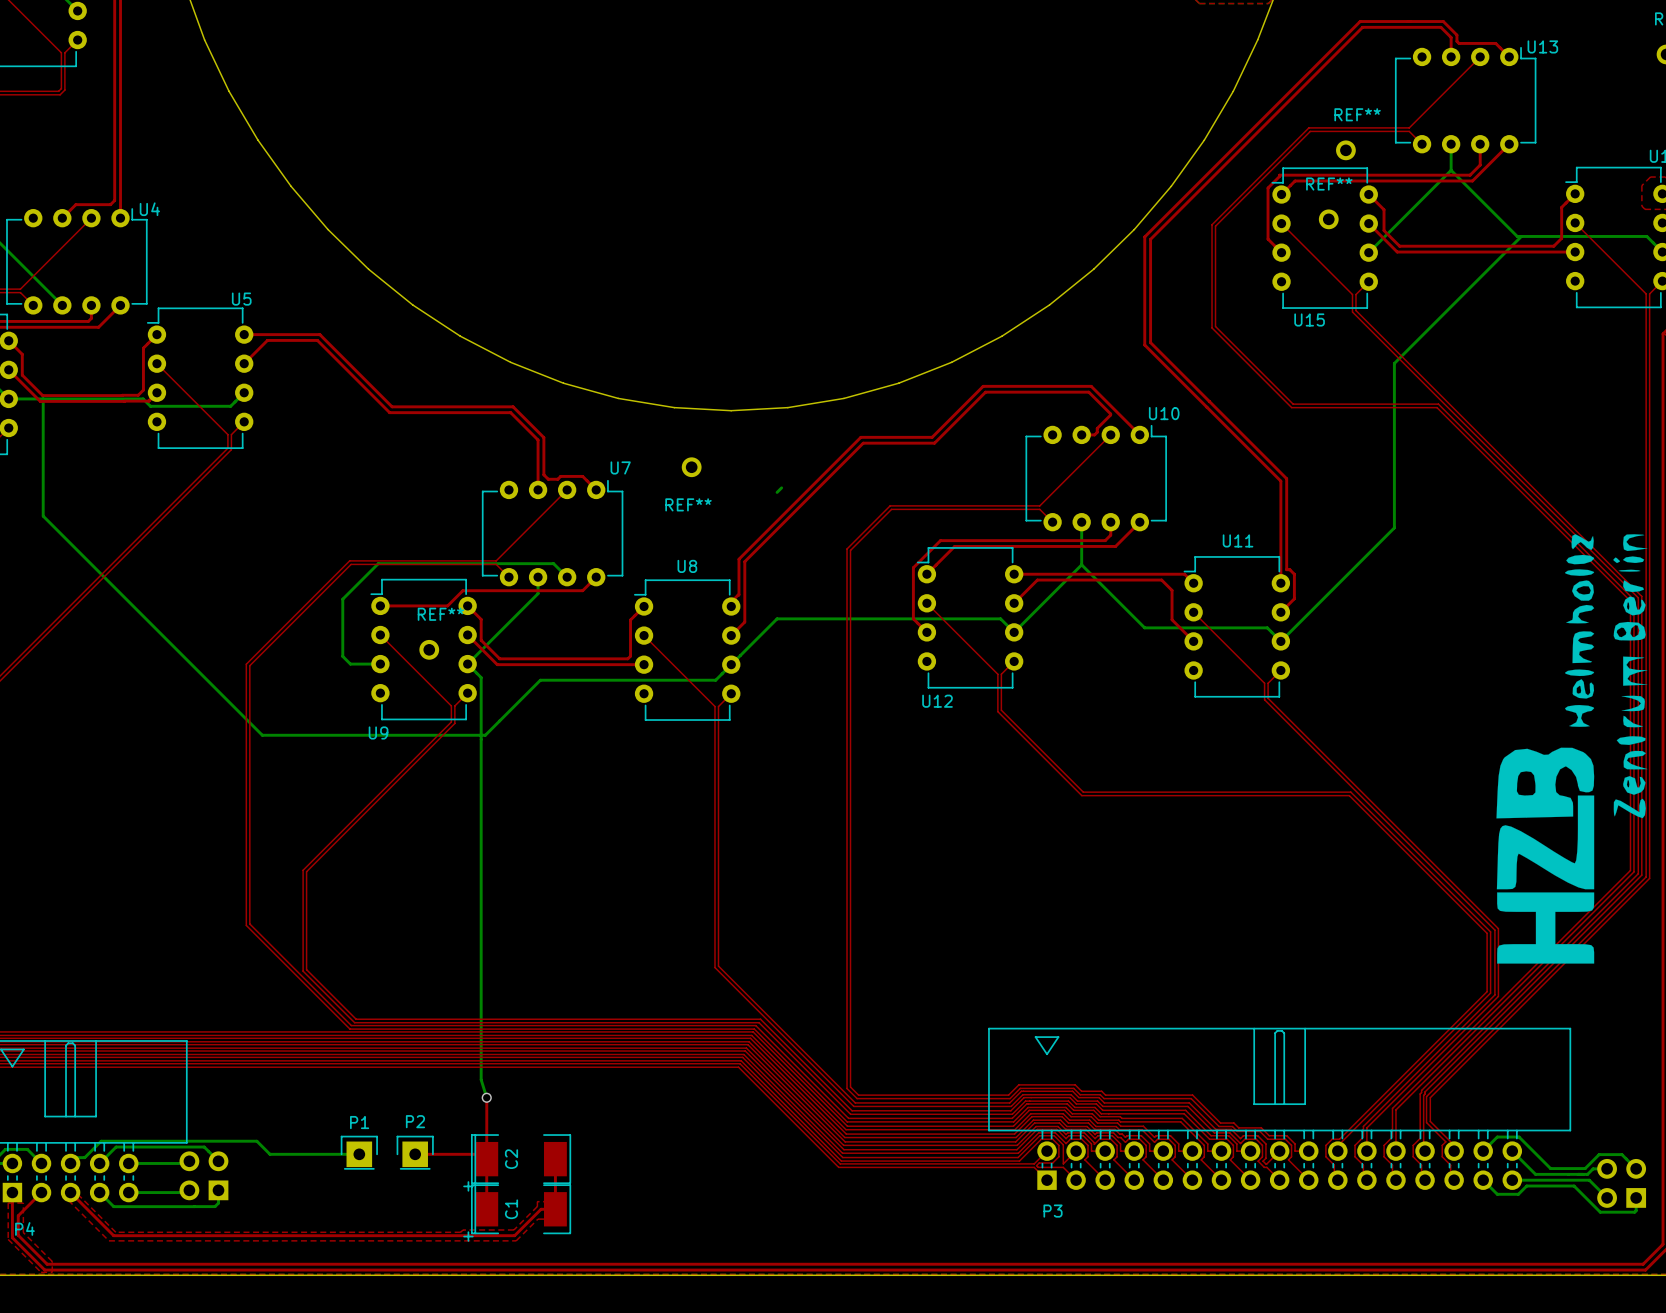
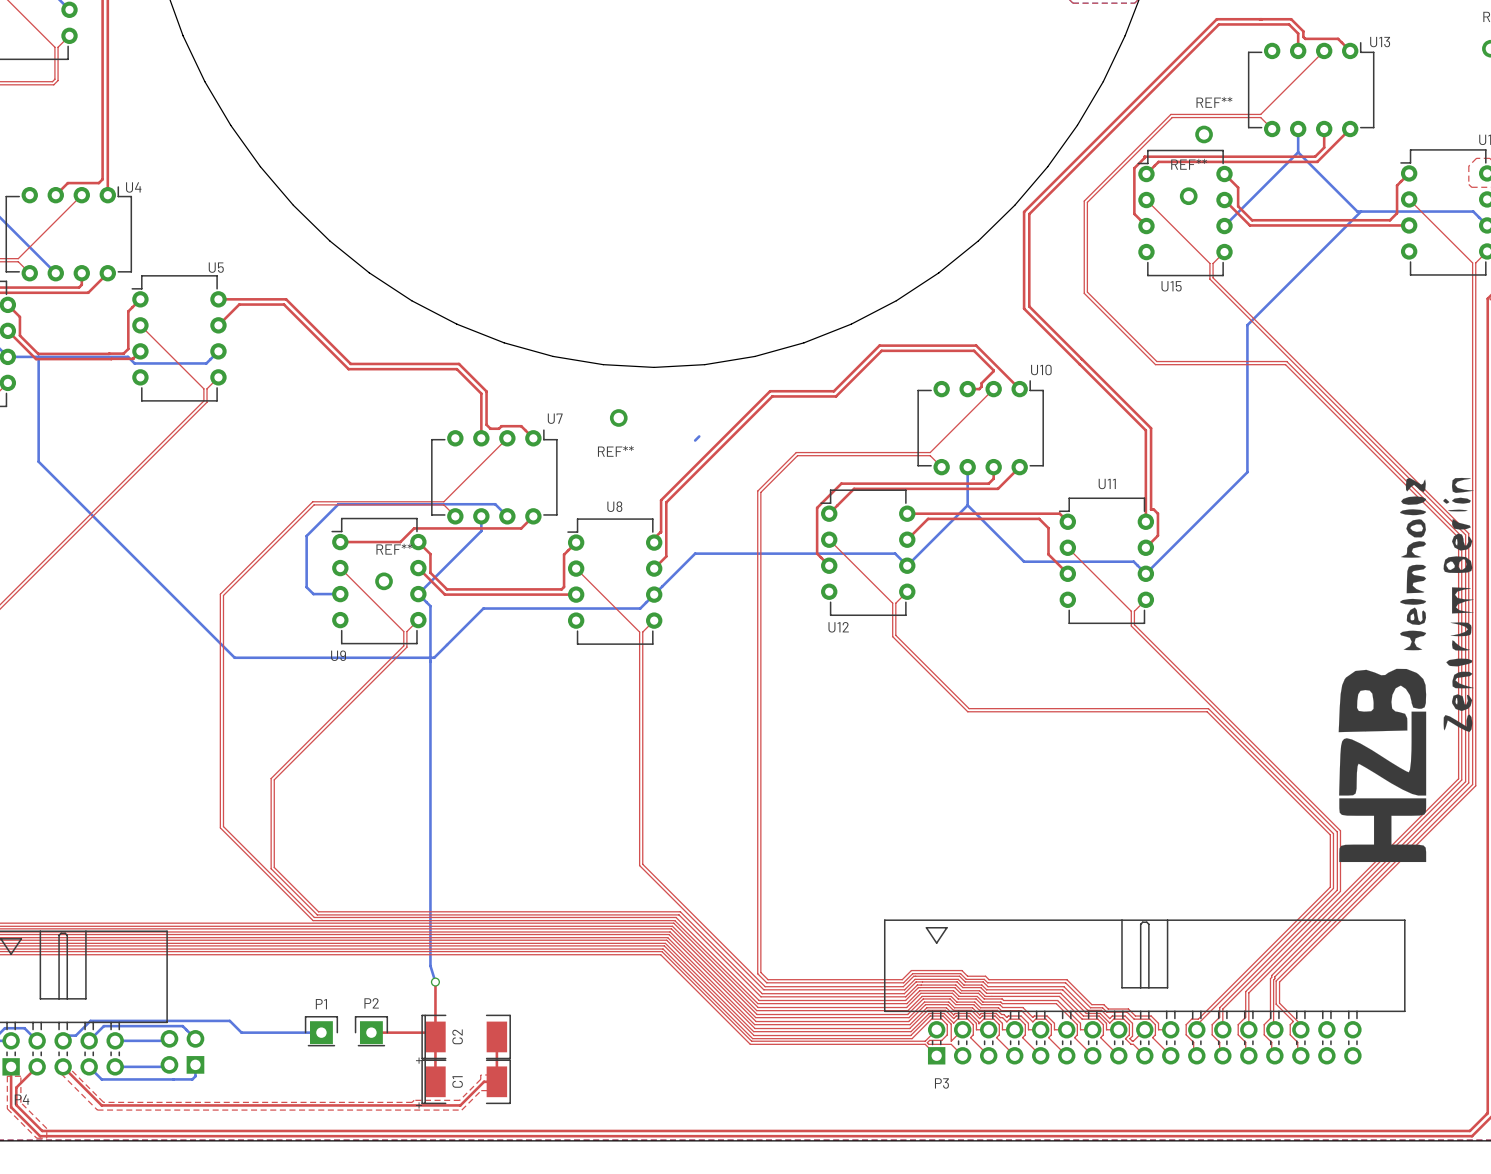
bottom track: (1483, 1151) (1497, 1137) (1519, 1137) (1550, 1168) (1585, 1168) (1599, 1154) (1621, 1154) (1636, 1168) -> none
bottom track: (1512, 1151) (1535, 1174) (1587, 1174) (1593, 1168) (1607, 1168) -> none
bottom track: (1483, 1180) (1497, 1194) (1518, 1194) (1526, 1186) (1574, 1186) (1600, 1212) (1634, 1212) (1636, 1197) -> none
bottom track: (1512, 1180) (1589, 1180) (1607, 1197) -> none
part: (1621, 1183) -> none

